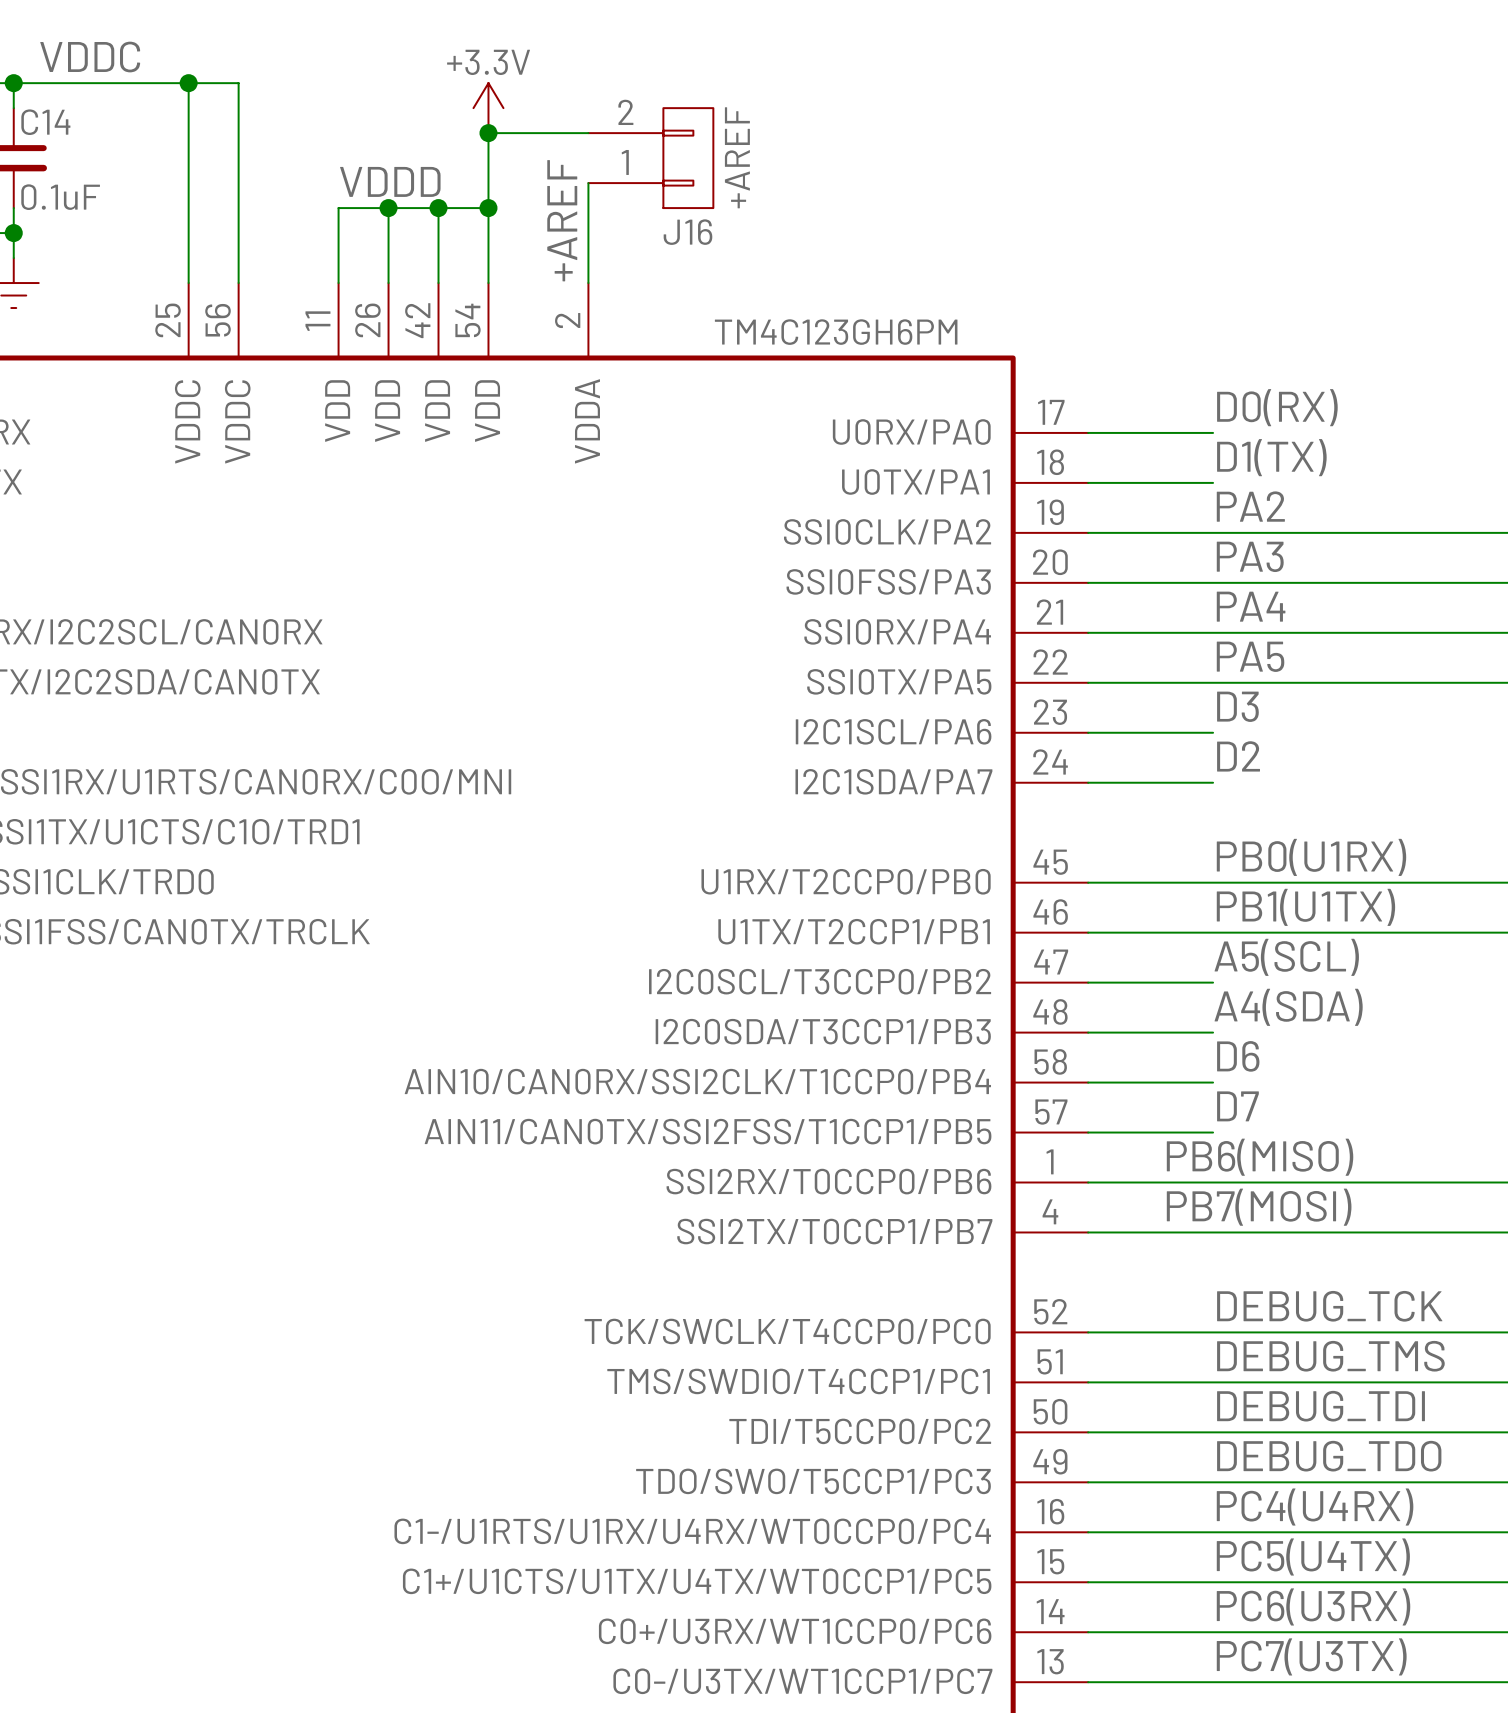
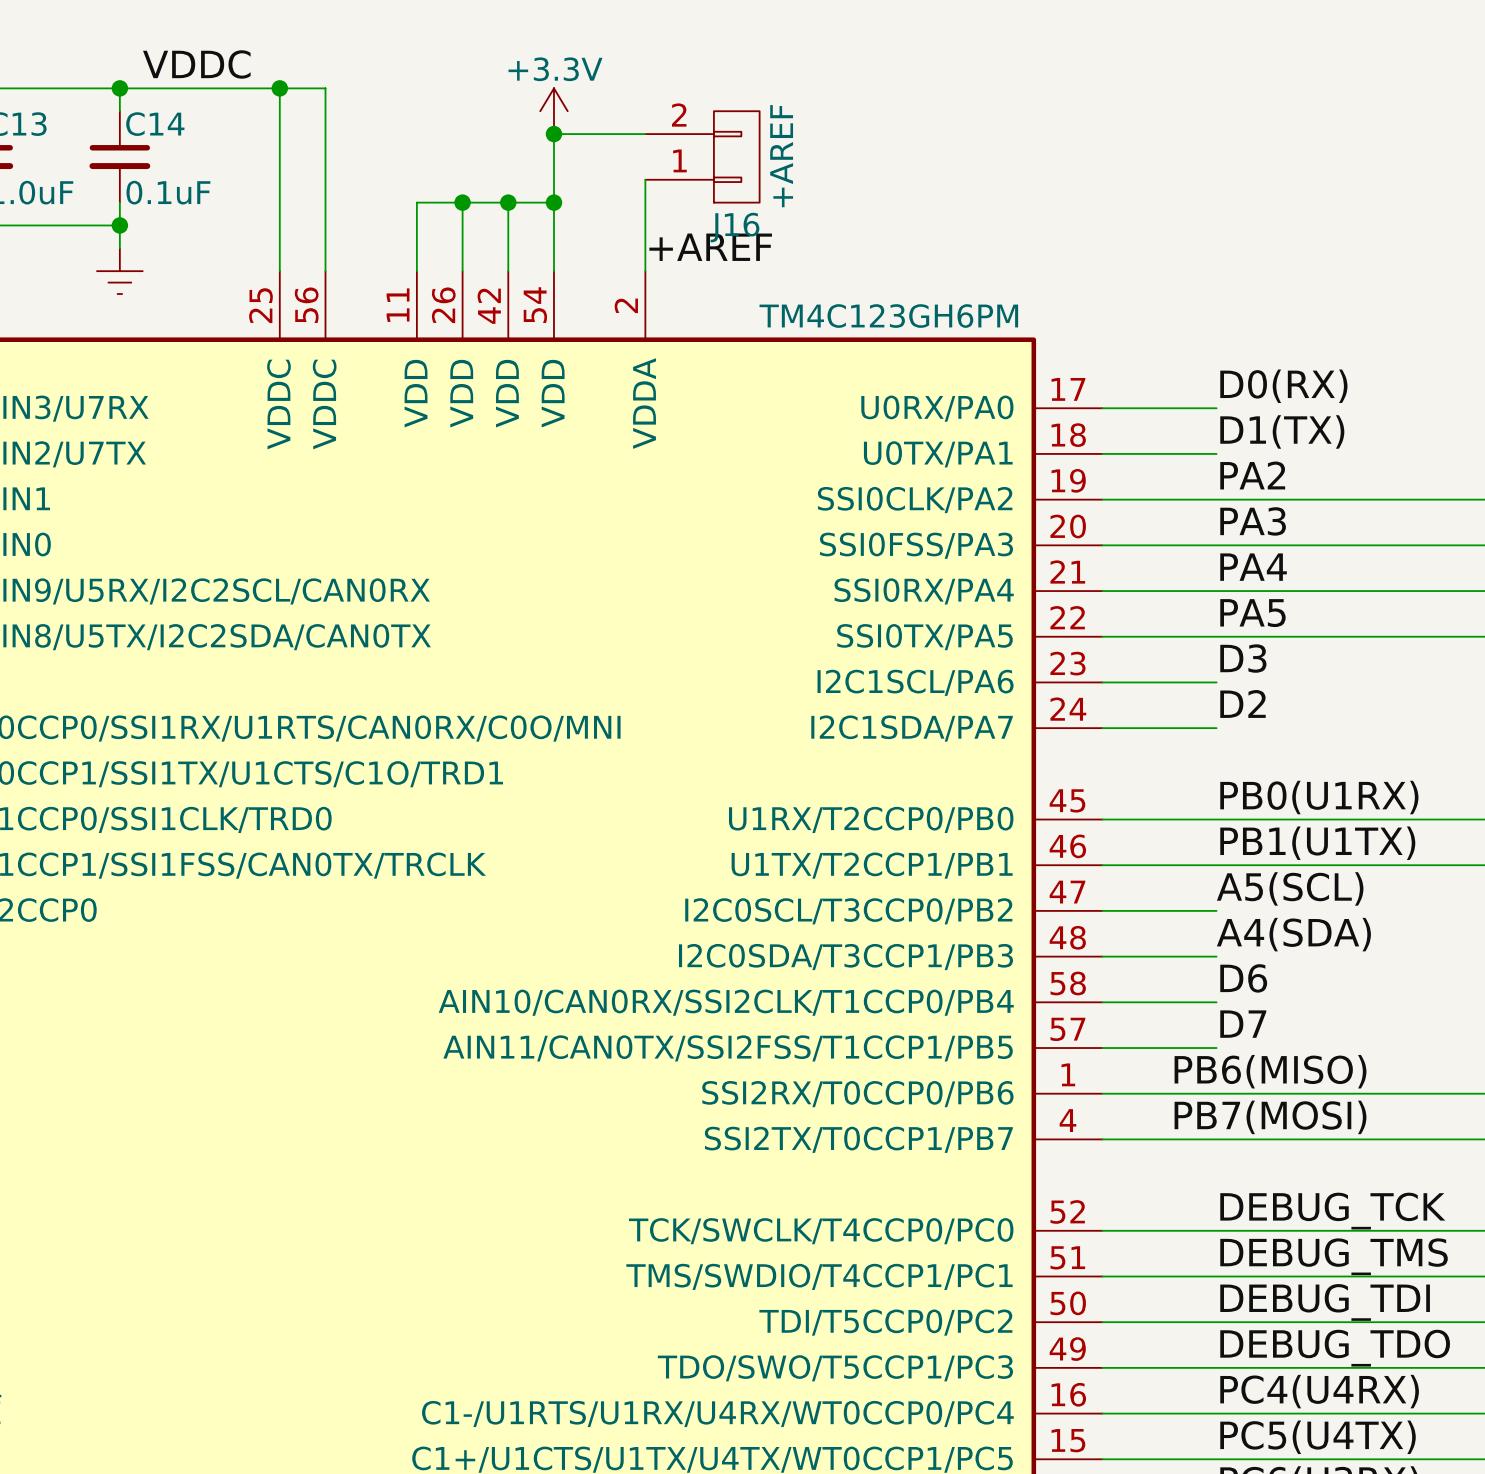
label: VDDD (390, 181) -> none
label rotation: 0° (562, 220) -> 90° clockwise (710, 247)

